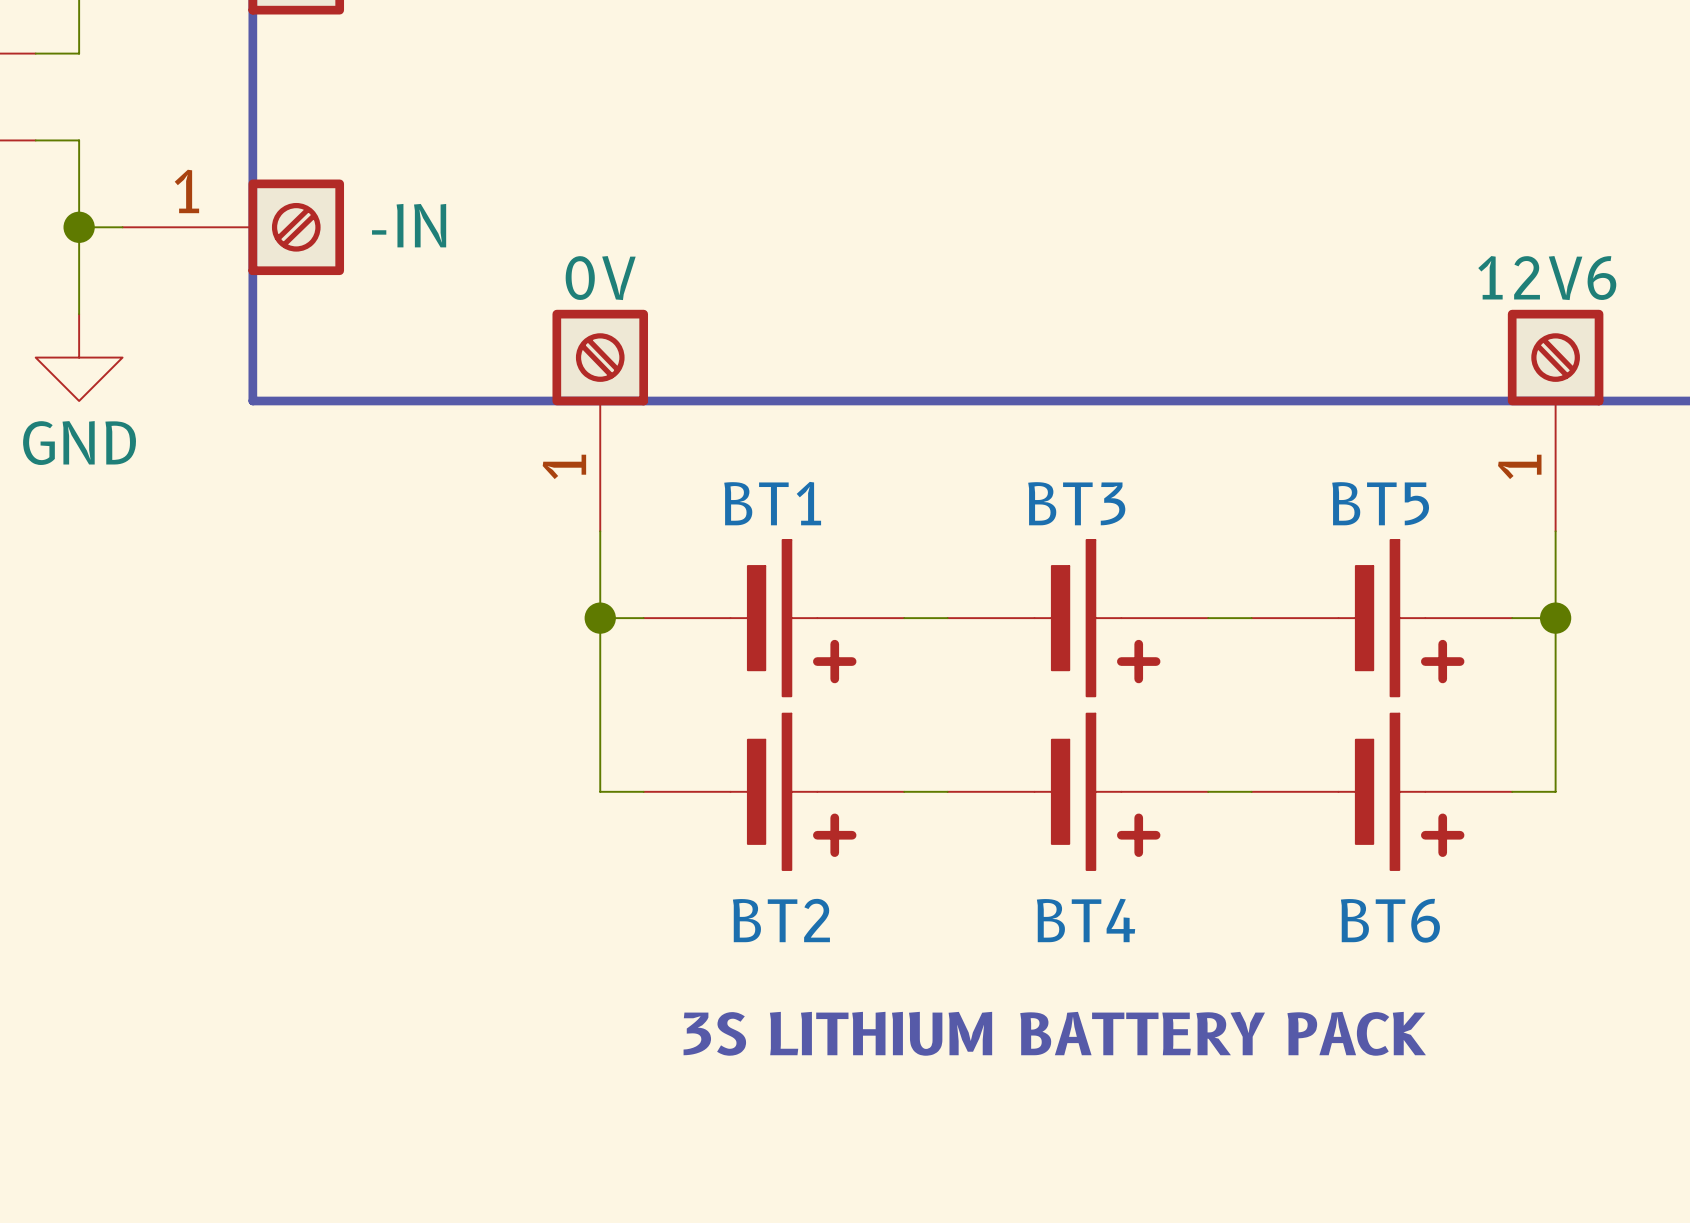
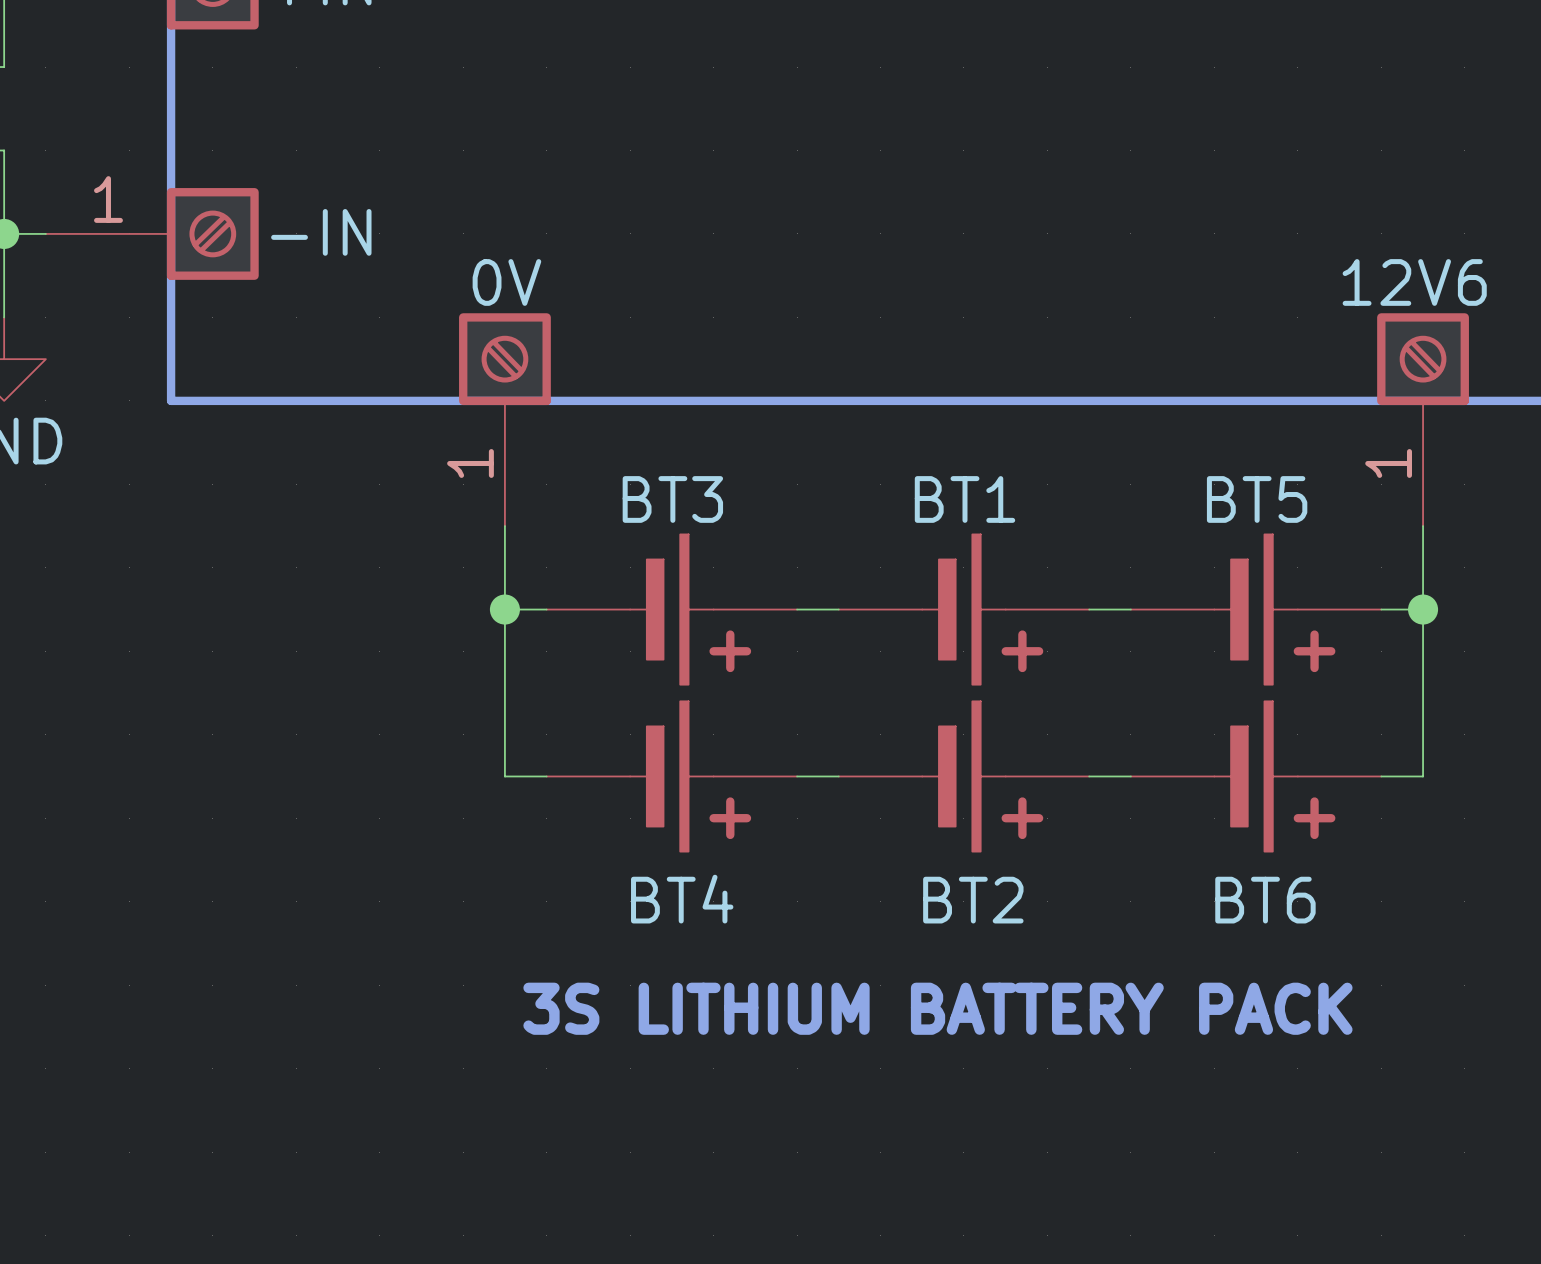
BT1 name: BT1 (772, 503) -> BT3 (672, 499)
BT3 name: BT3 (1076, 503) -> BT1 (964, 499)
BT2 name: BT2 (781, 920) -> BT4 (682, 899)
BT4 name: BT4 (1086, 920) -> BT2 (973, 900)

